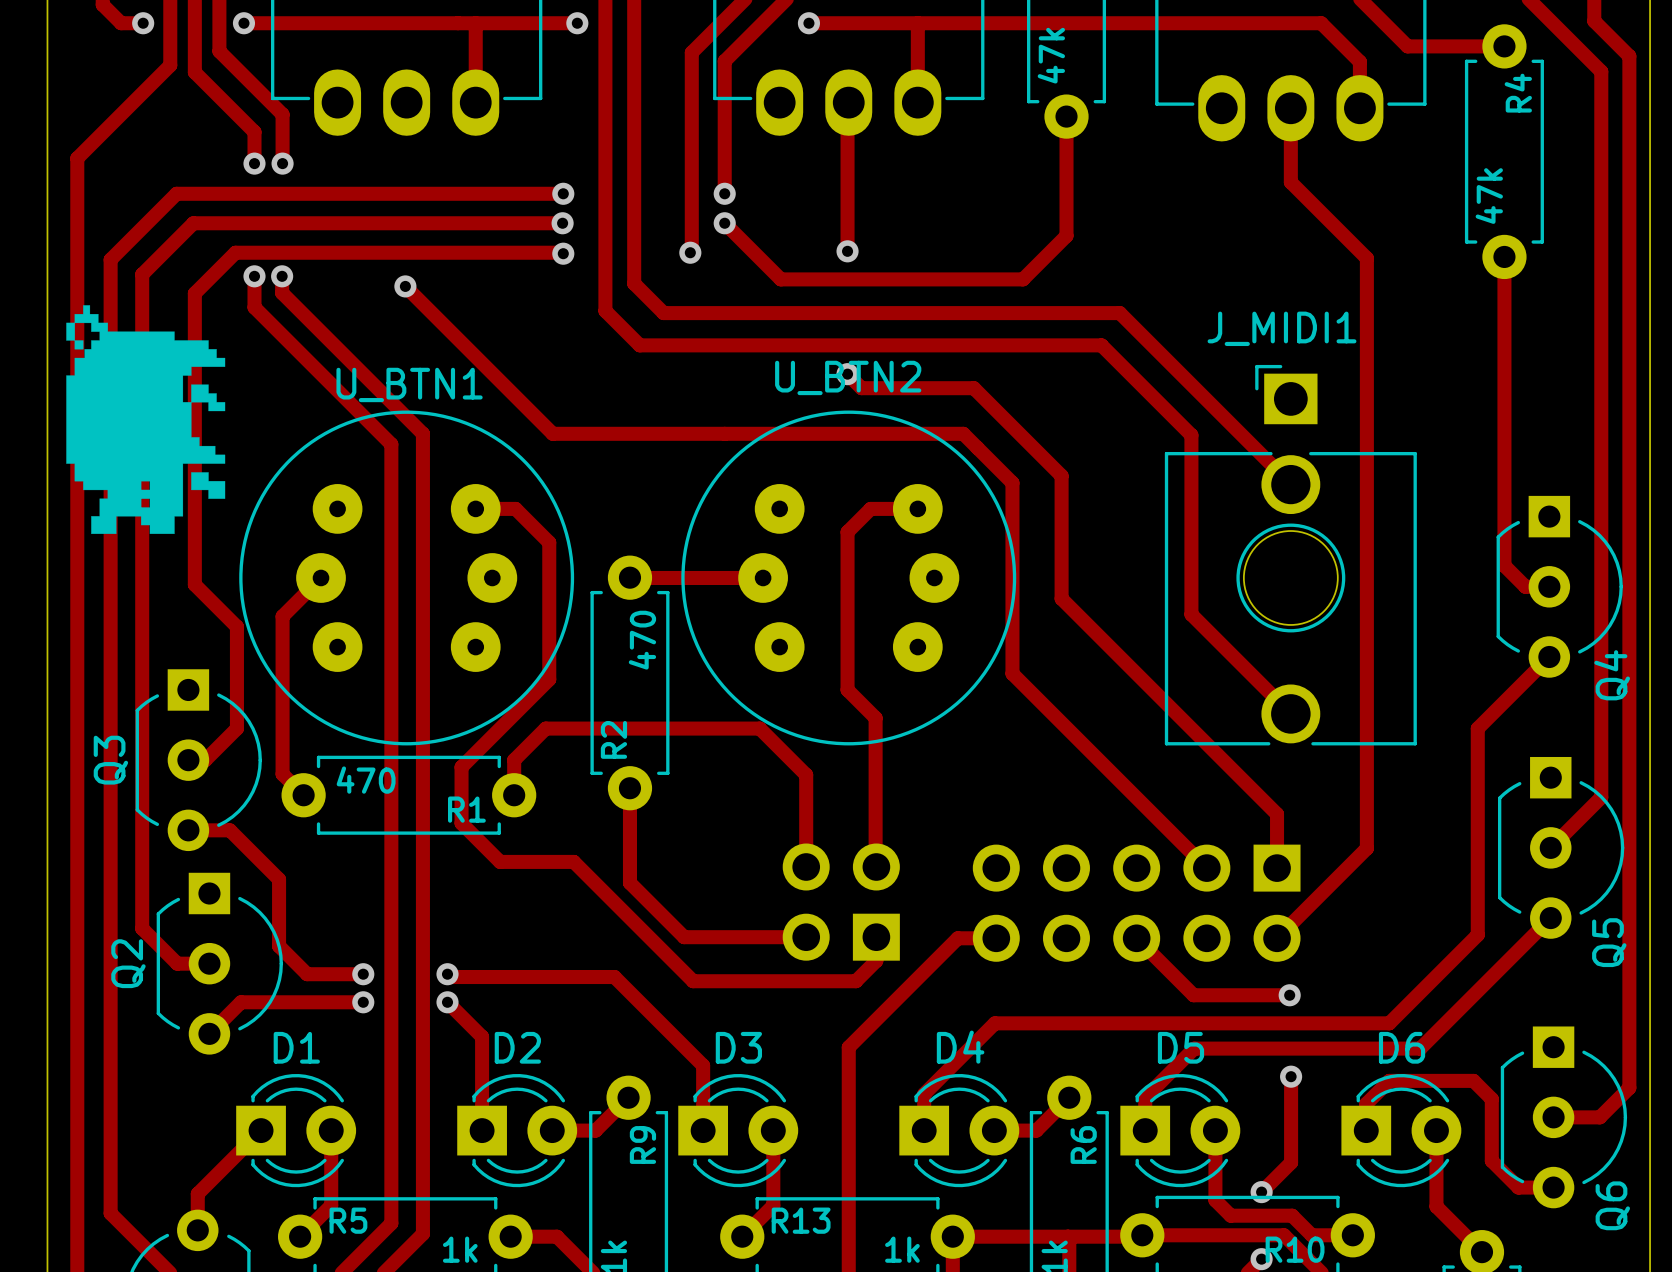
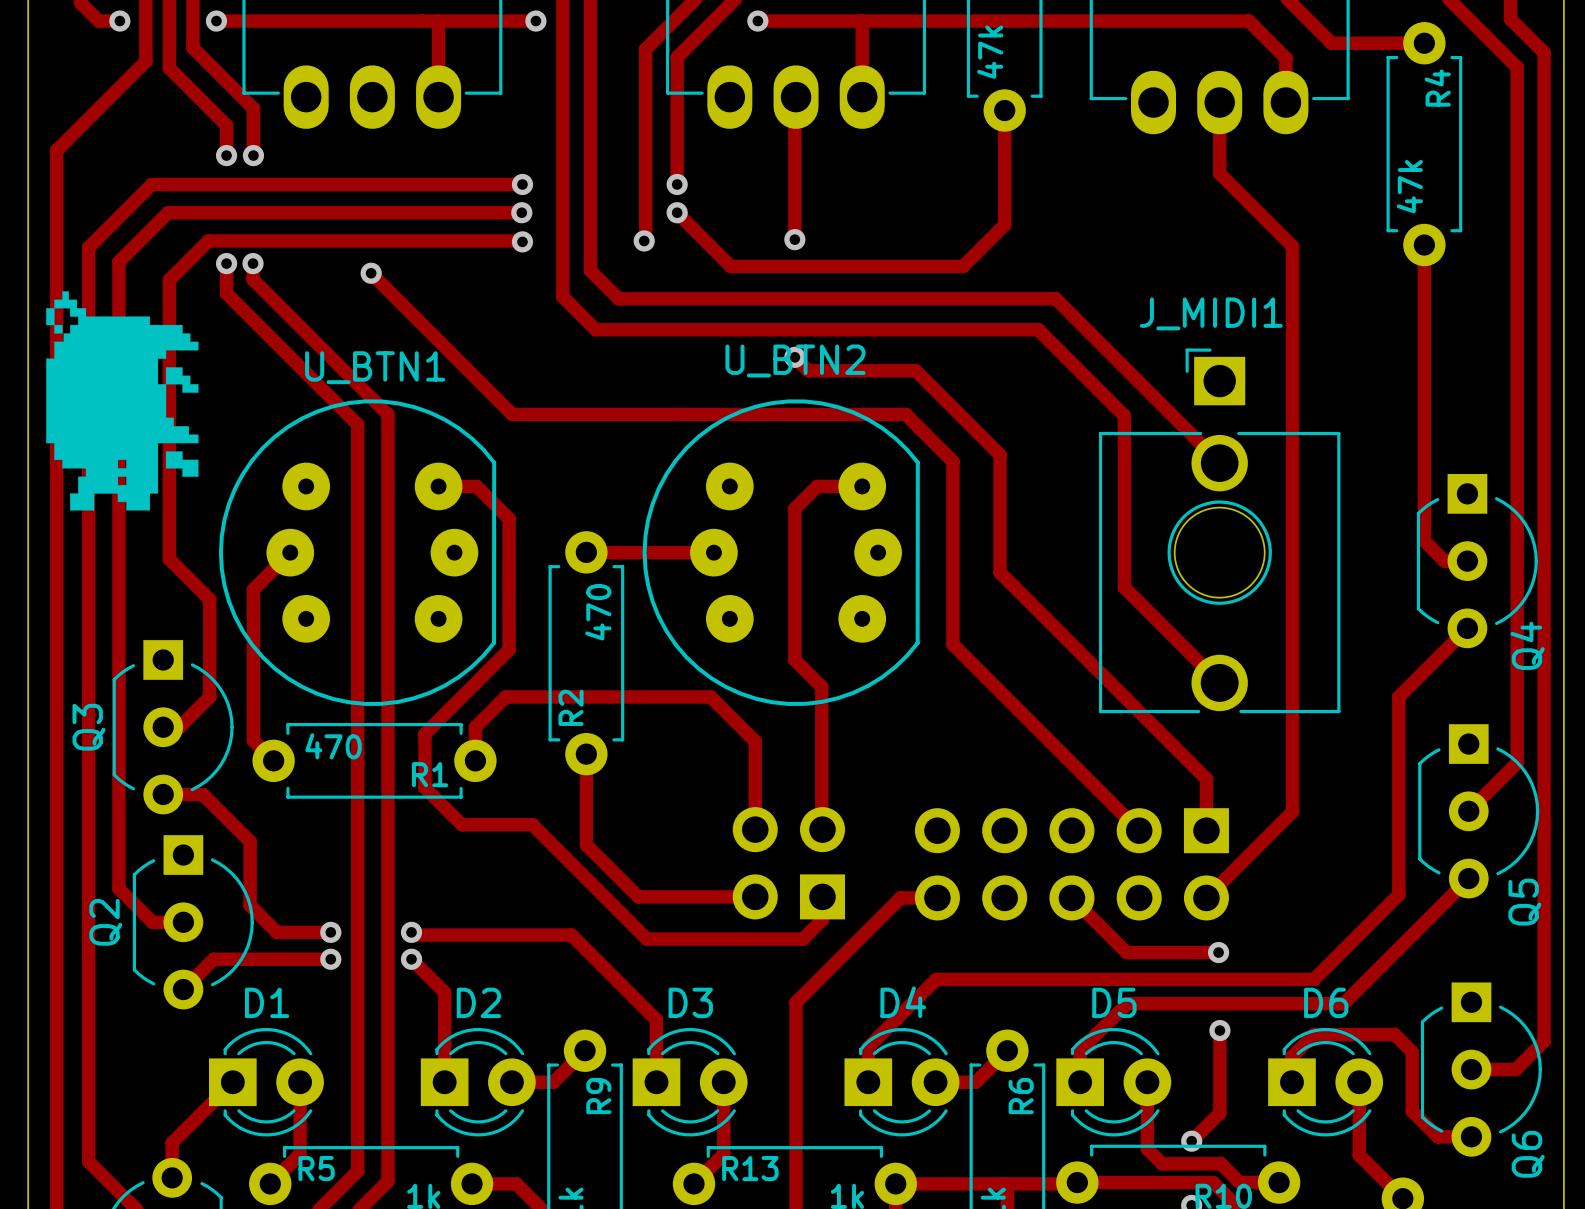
U_BTN1 footprint: [239, 410, 575, 746] -> [218, 399, 497, 706]
U_BTN2 footprint: [681, 410, 1017, 746] -> [642, 399, 920, 706]

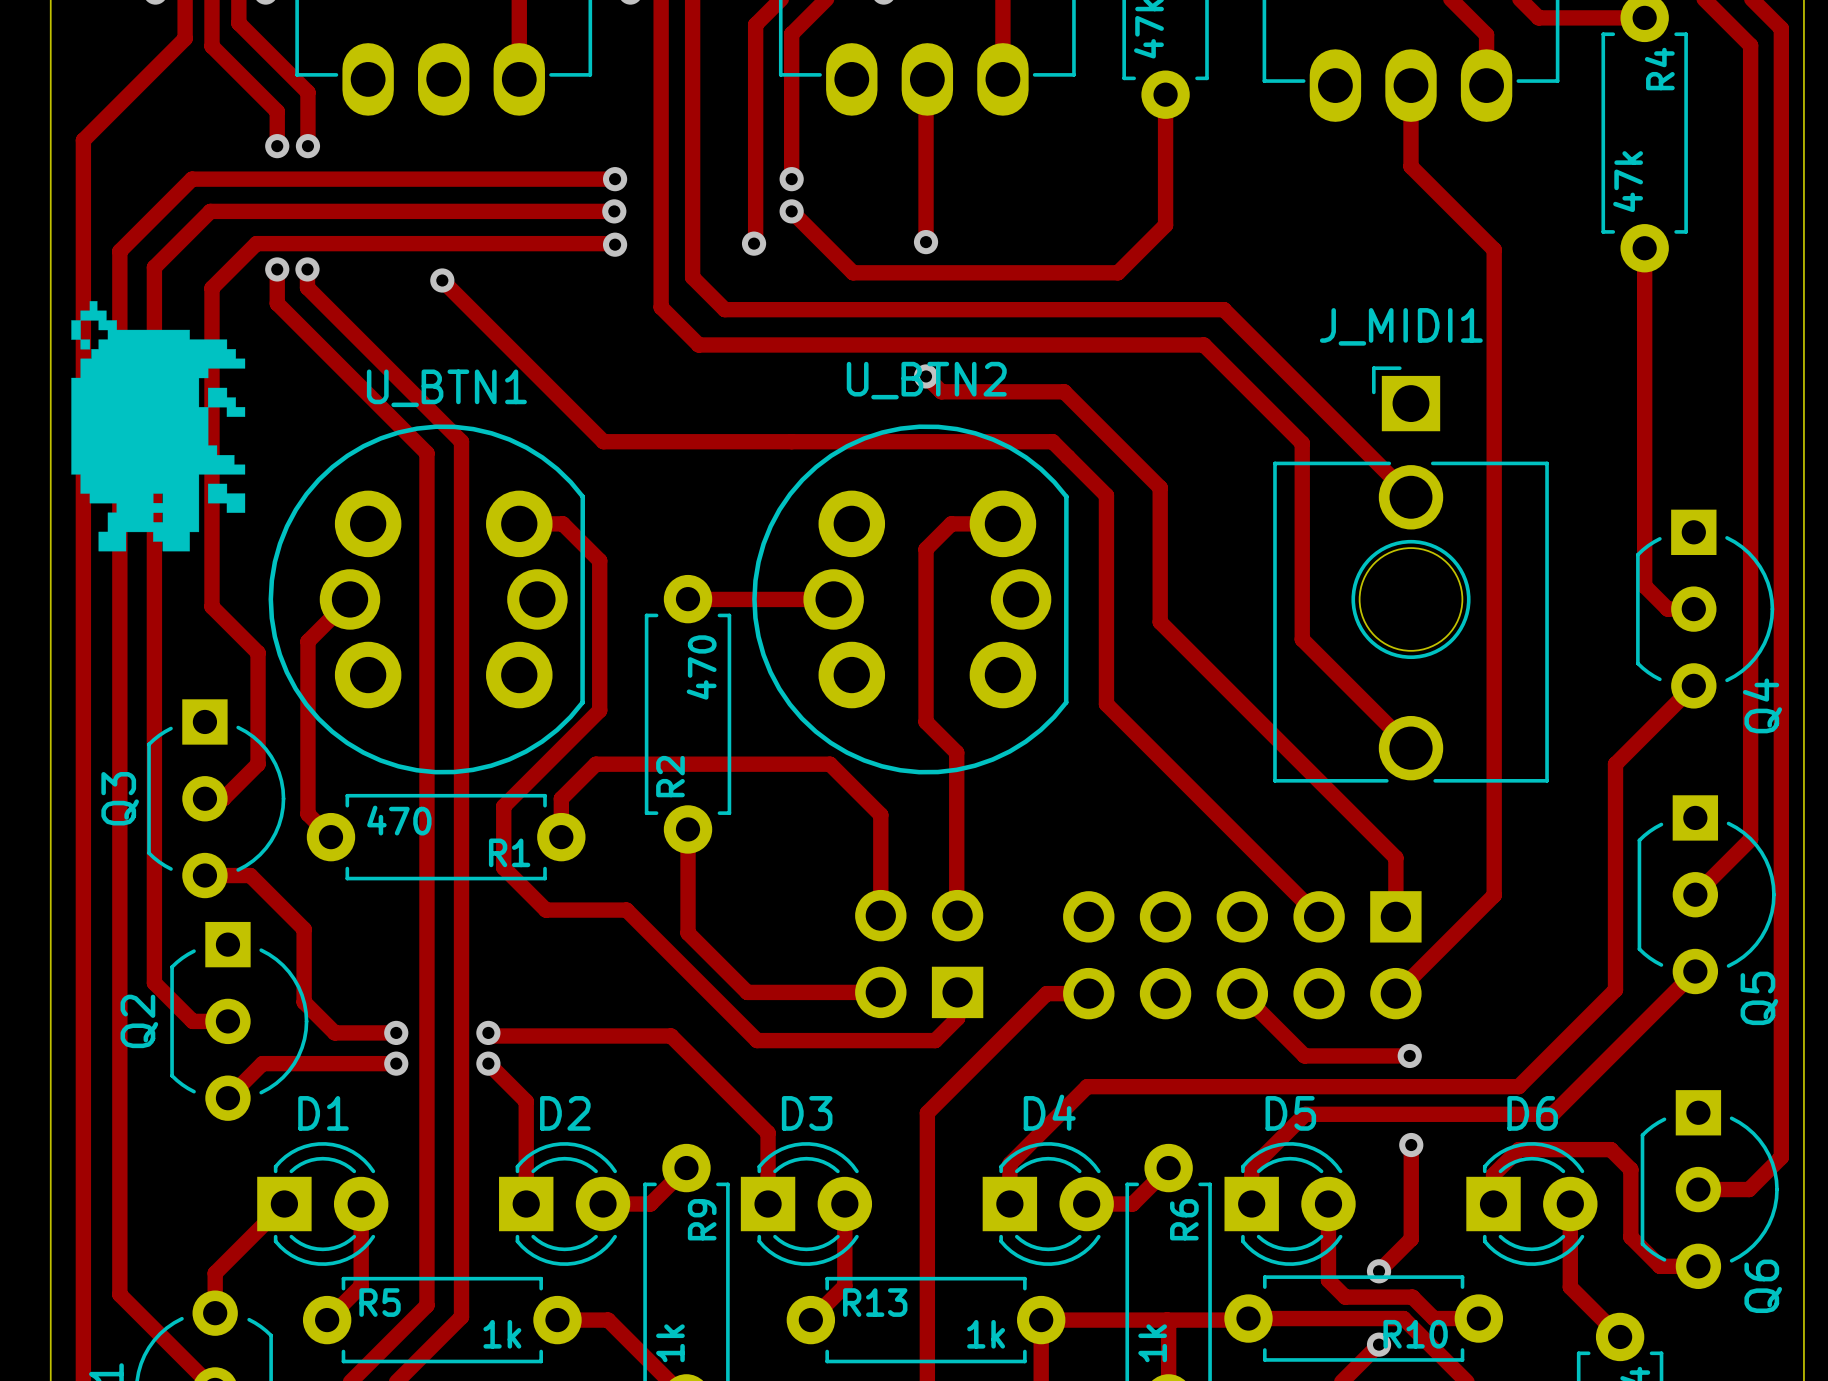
U_BTN1 footprint: [218, 399, 497, 706] -> [268, 424, 586, 775]
U_BTN2 footprint: [642, 399, 920, 706] -> [752, 424, 1069, 775]

